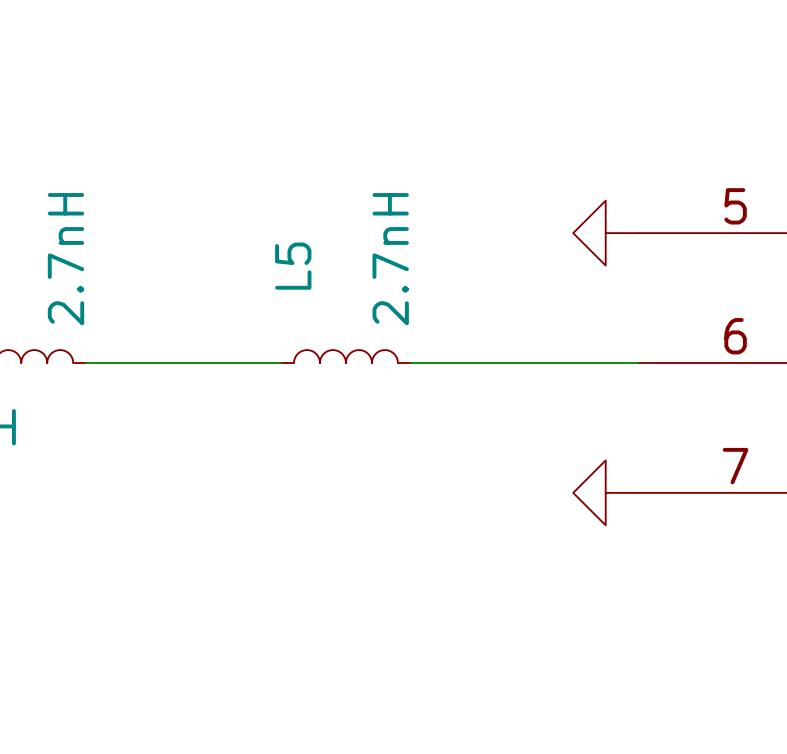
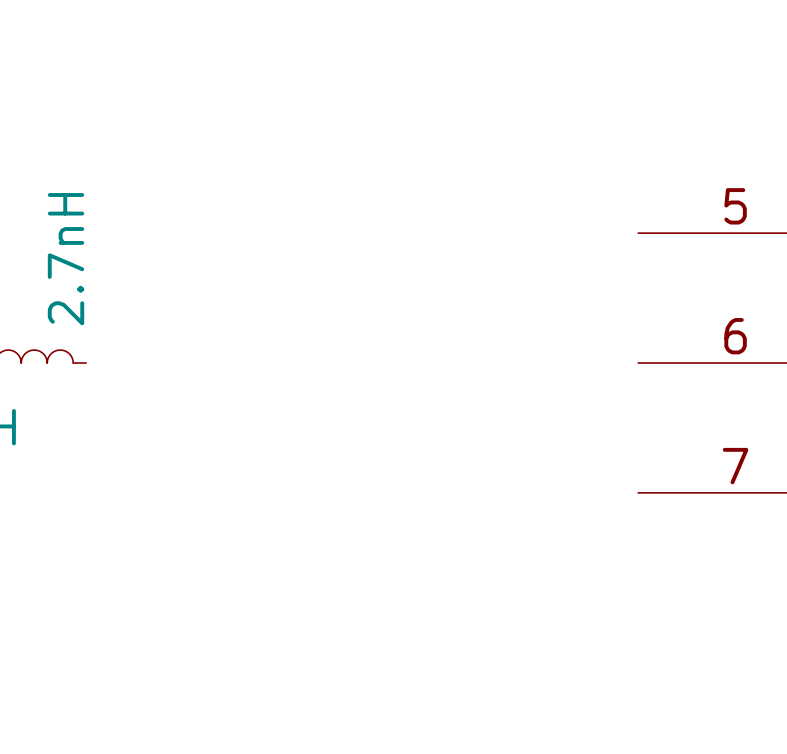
power symbol: (605, 233) -> none
L5: 2.7nH (345, 356) -> none
wire: (86, 362) (281, 362) -> none
wire: (410, 362) (638, 362) -> none
power symbol: (605, 492) -> none

